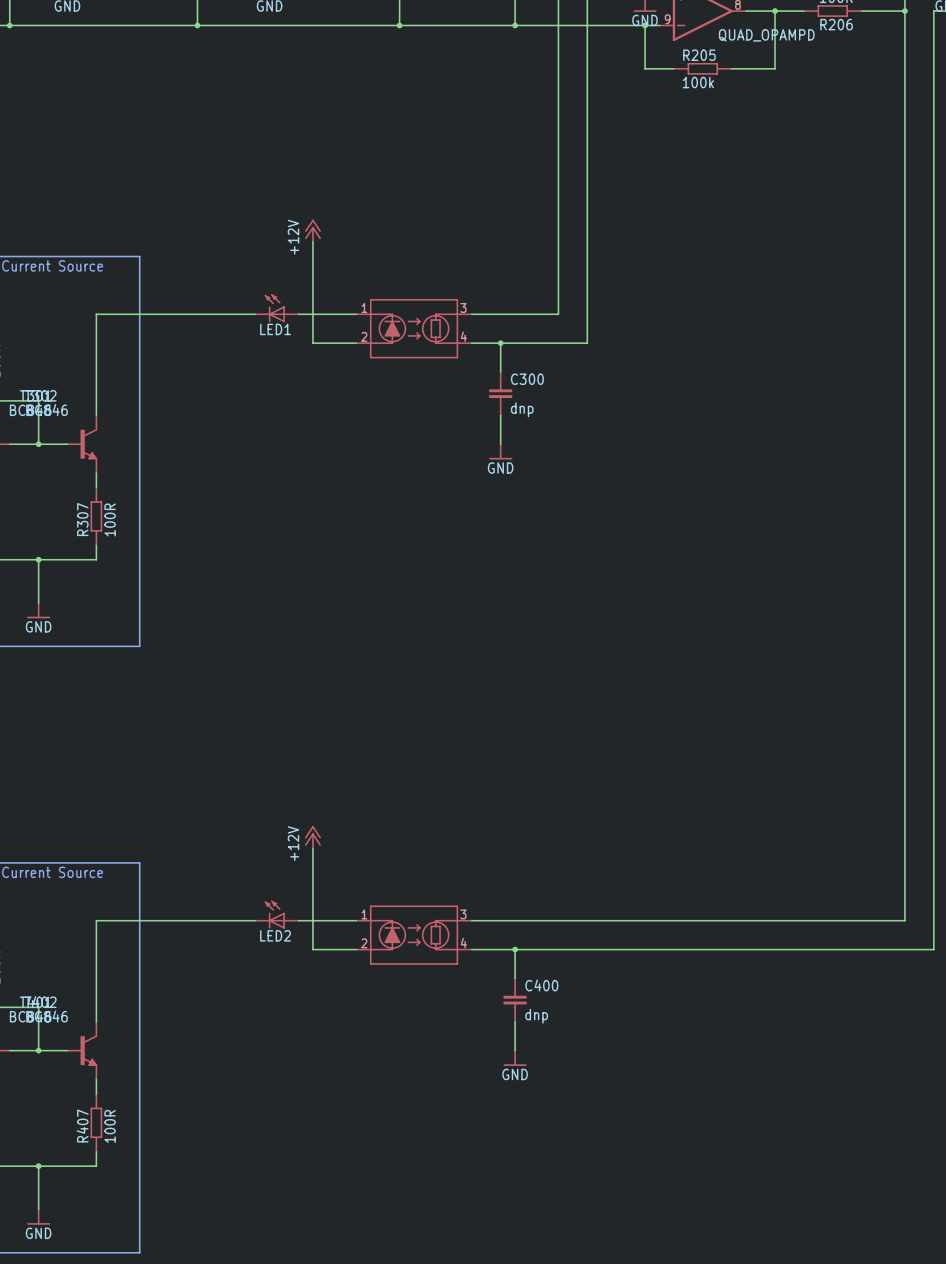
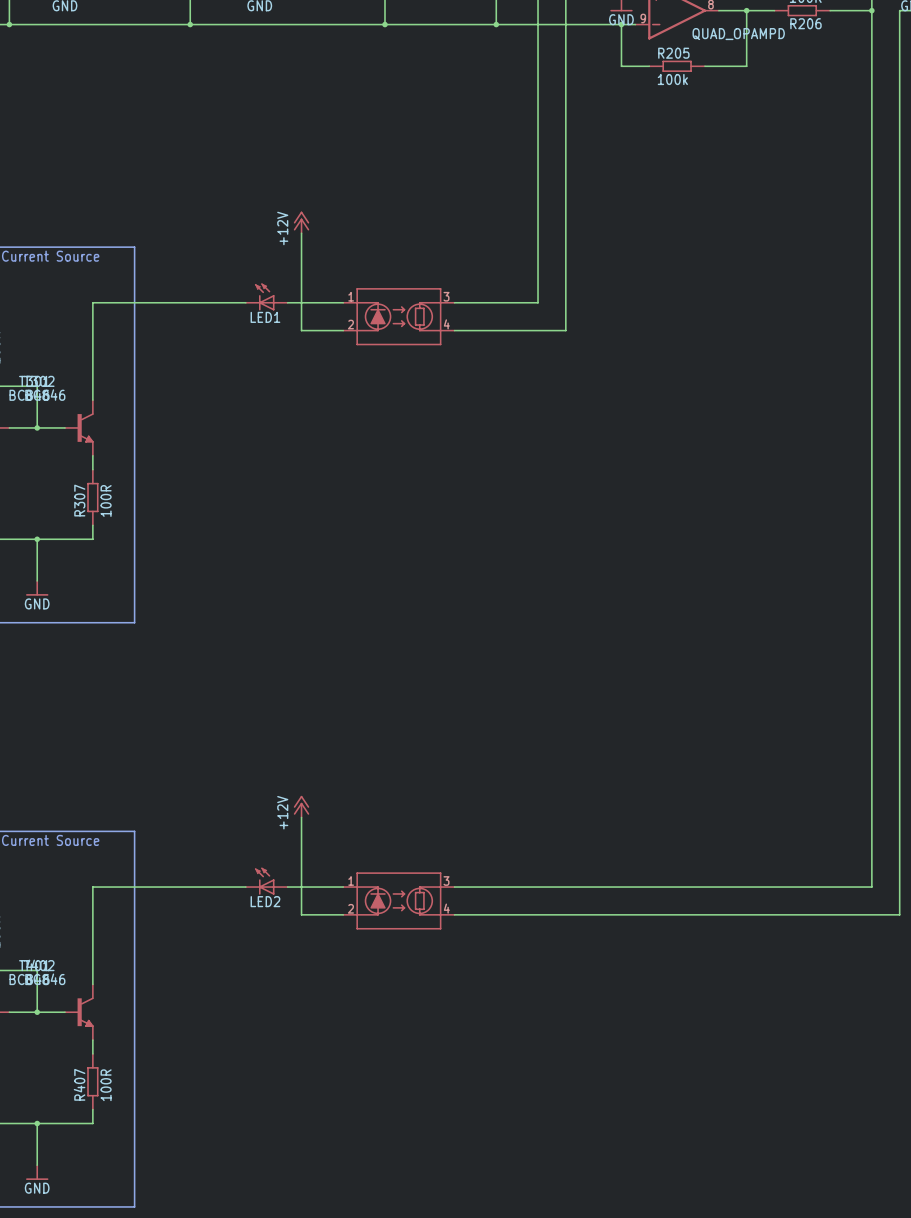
wire: (500, 343) (500, 372) -> none
junction: (500, 343) -> none
C300: dnp (500, 393) -> none
wire: (500, 415) (500, 444) -> none
power symbol: GND (500, 451) -> none
wire: (515, 949) (515, 978) -> none
junction: (515, 949) -> none
C400: dnp (515, 1000) -> none
wire: (515, 1021) (515, 1050) -> none
power symbol: GND (515, 1058) -> none

